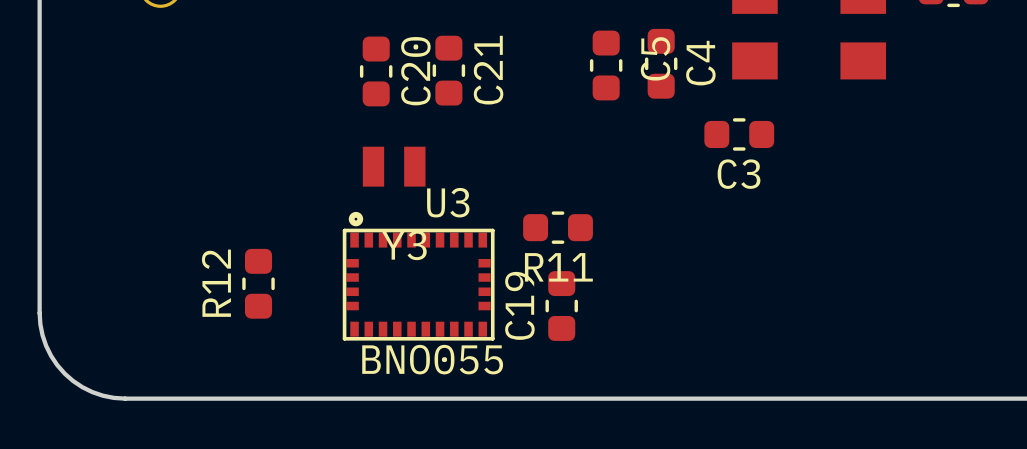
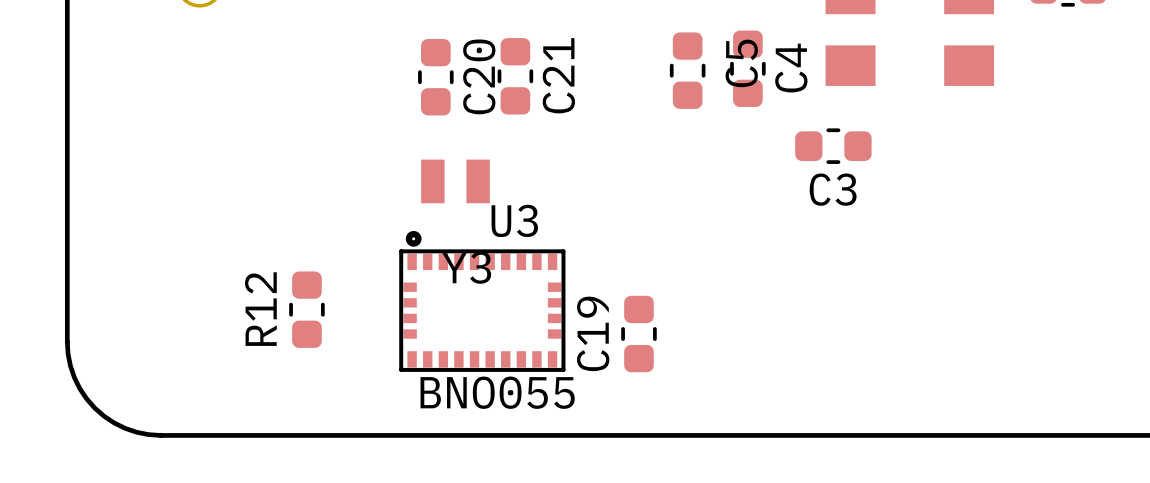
R11: (558, 227) -> none

